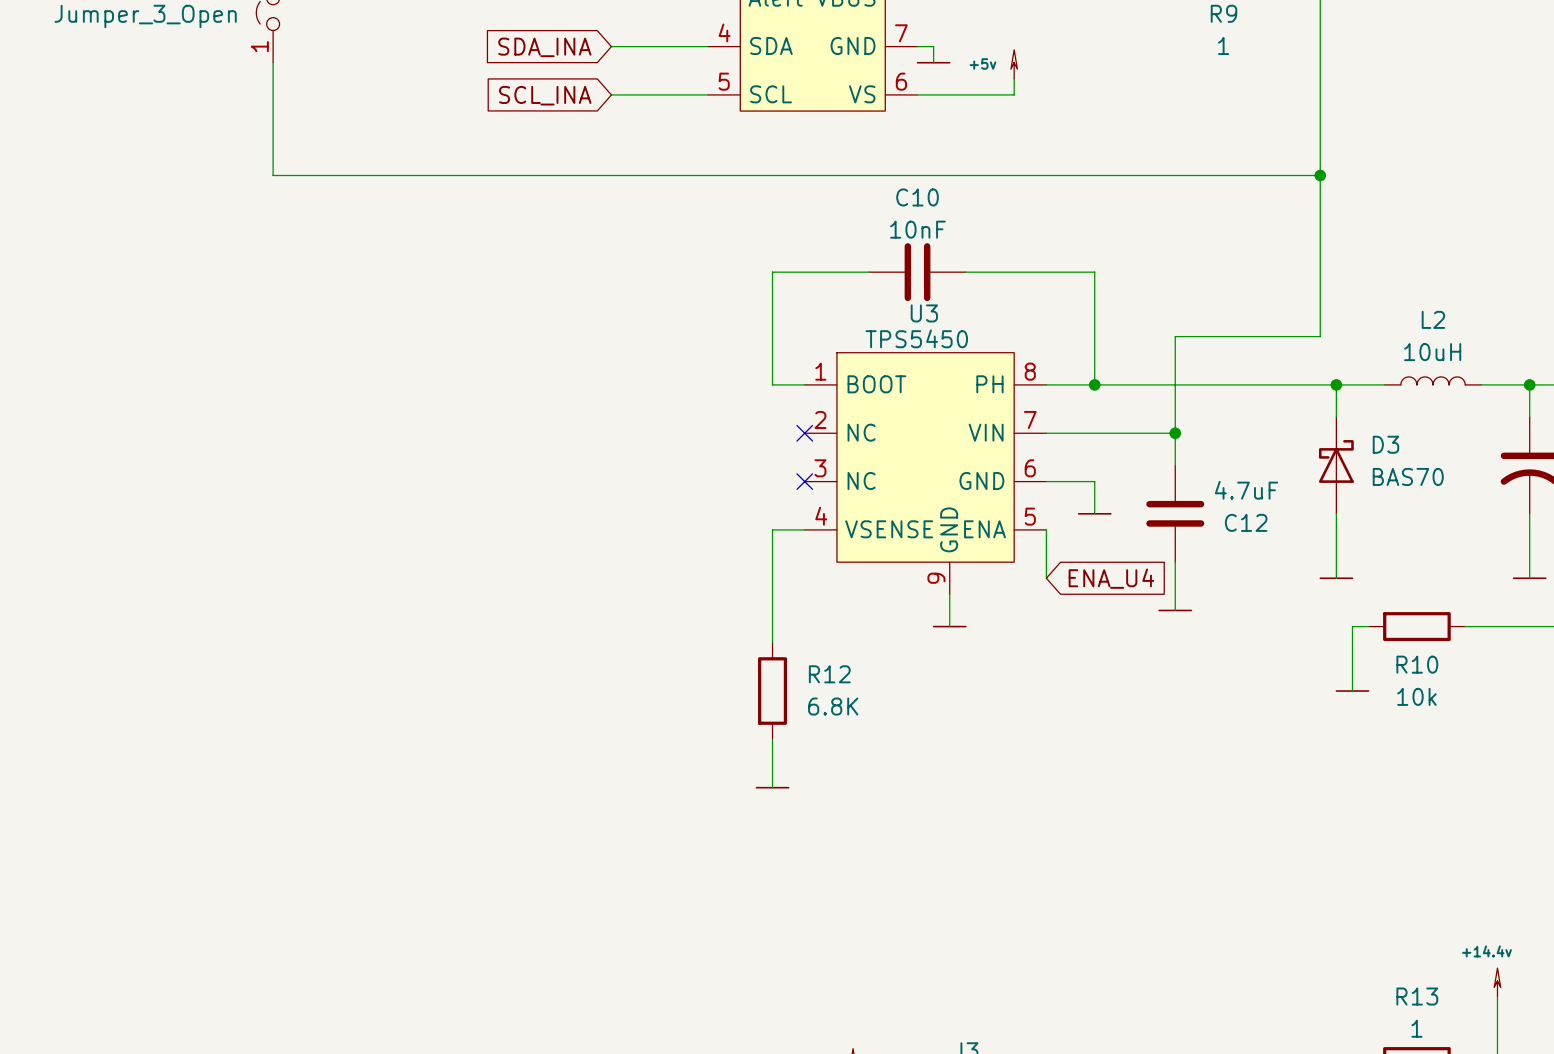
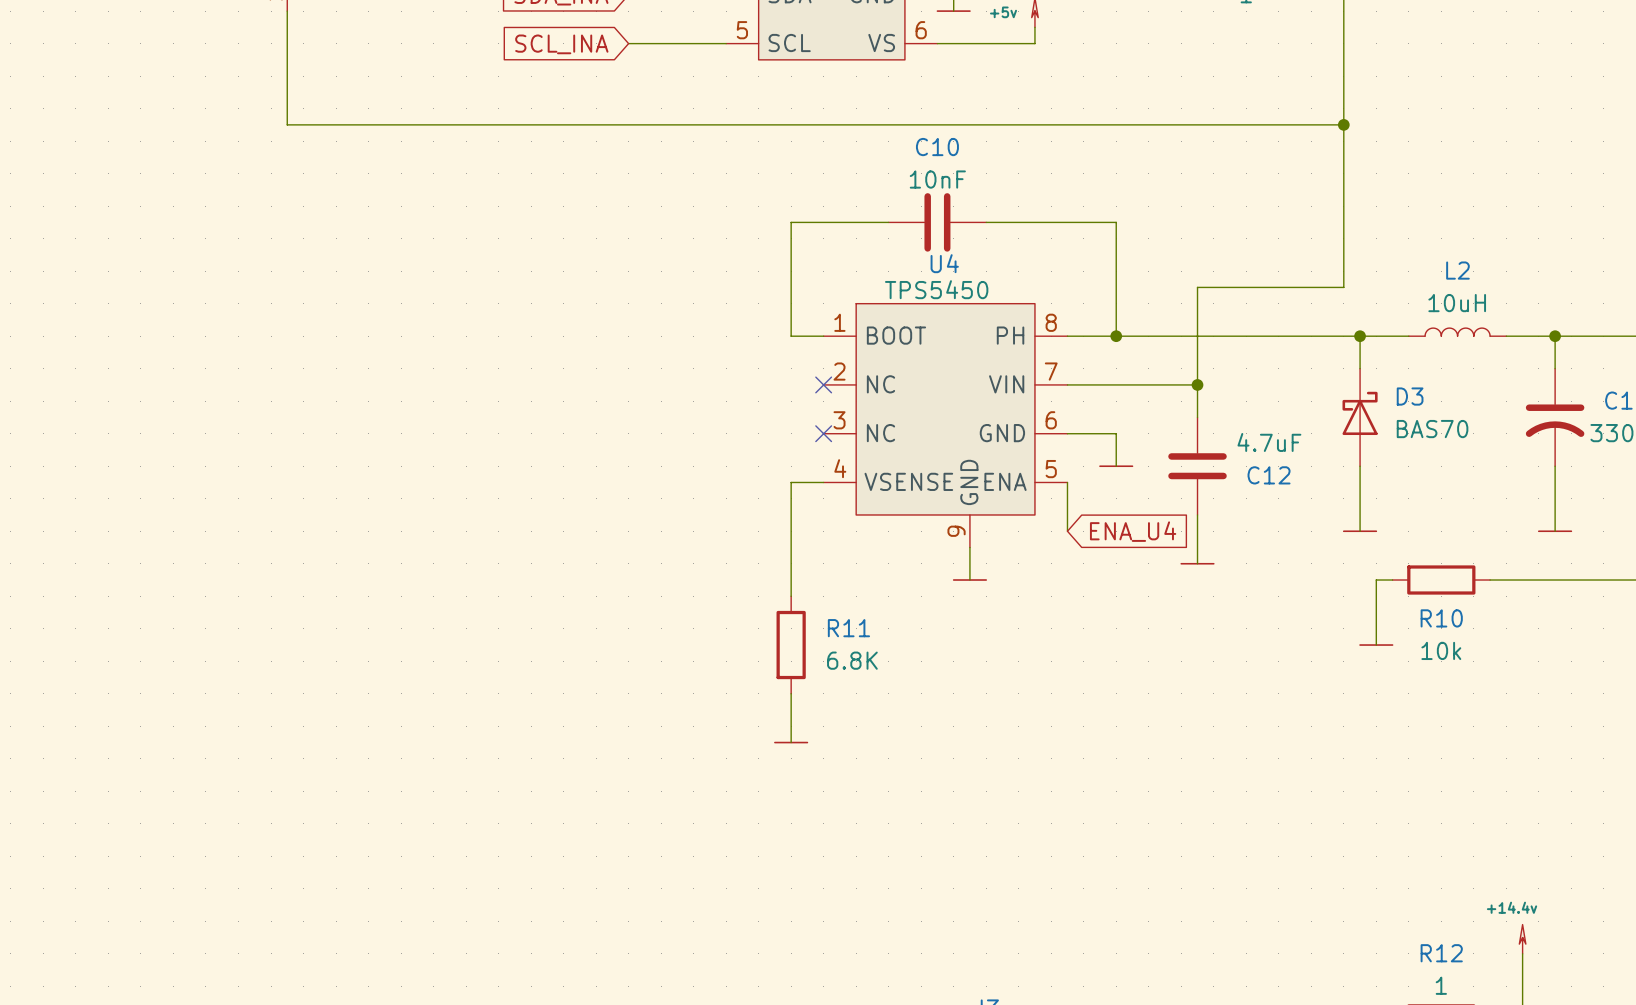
U3 name: U3 (924, 313) -> U4 (944, 263)
R12 name: R12 (829, 674) -> R11 (848, 628)
R13 name: R13 (1417, 996) -> R12 (1441, 953)

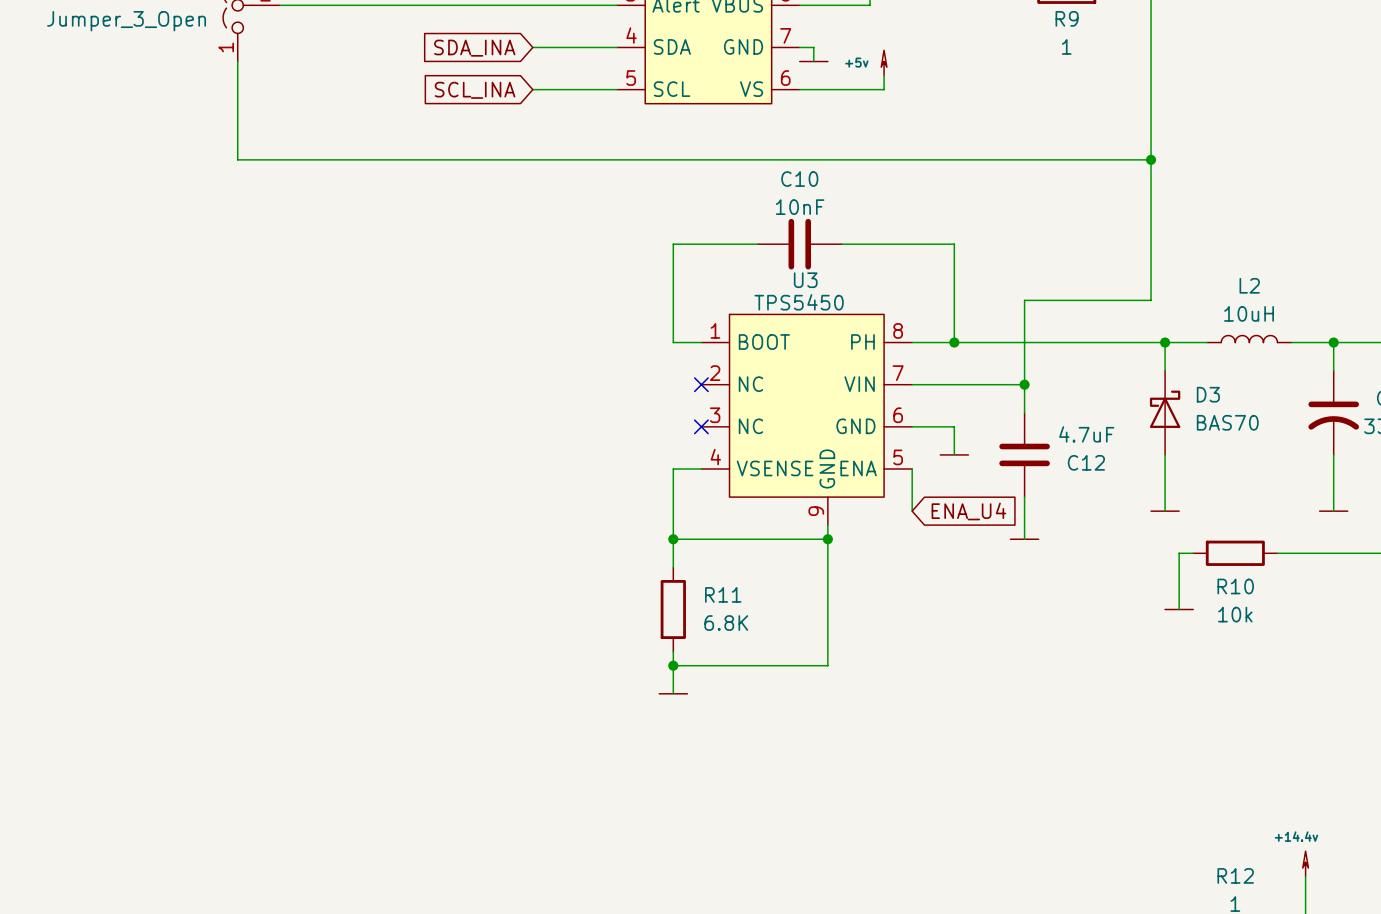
U4 name: U4 (944, 263) -> U3 (805, 280)
wire: none -> (673, 539) (827, 539)
junction: none -> (673, 539)
junction: none -> (827, 539)
wire: none -> (827, 553) (827, 665) (673, 665)
power symbol: (969, 580) -> none
junction: none -> (673, 665)

